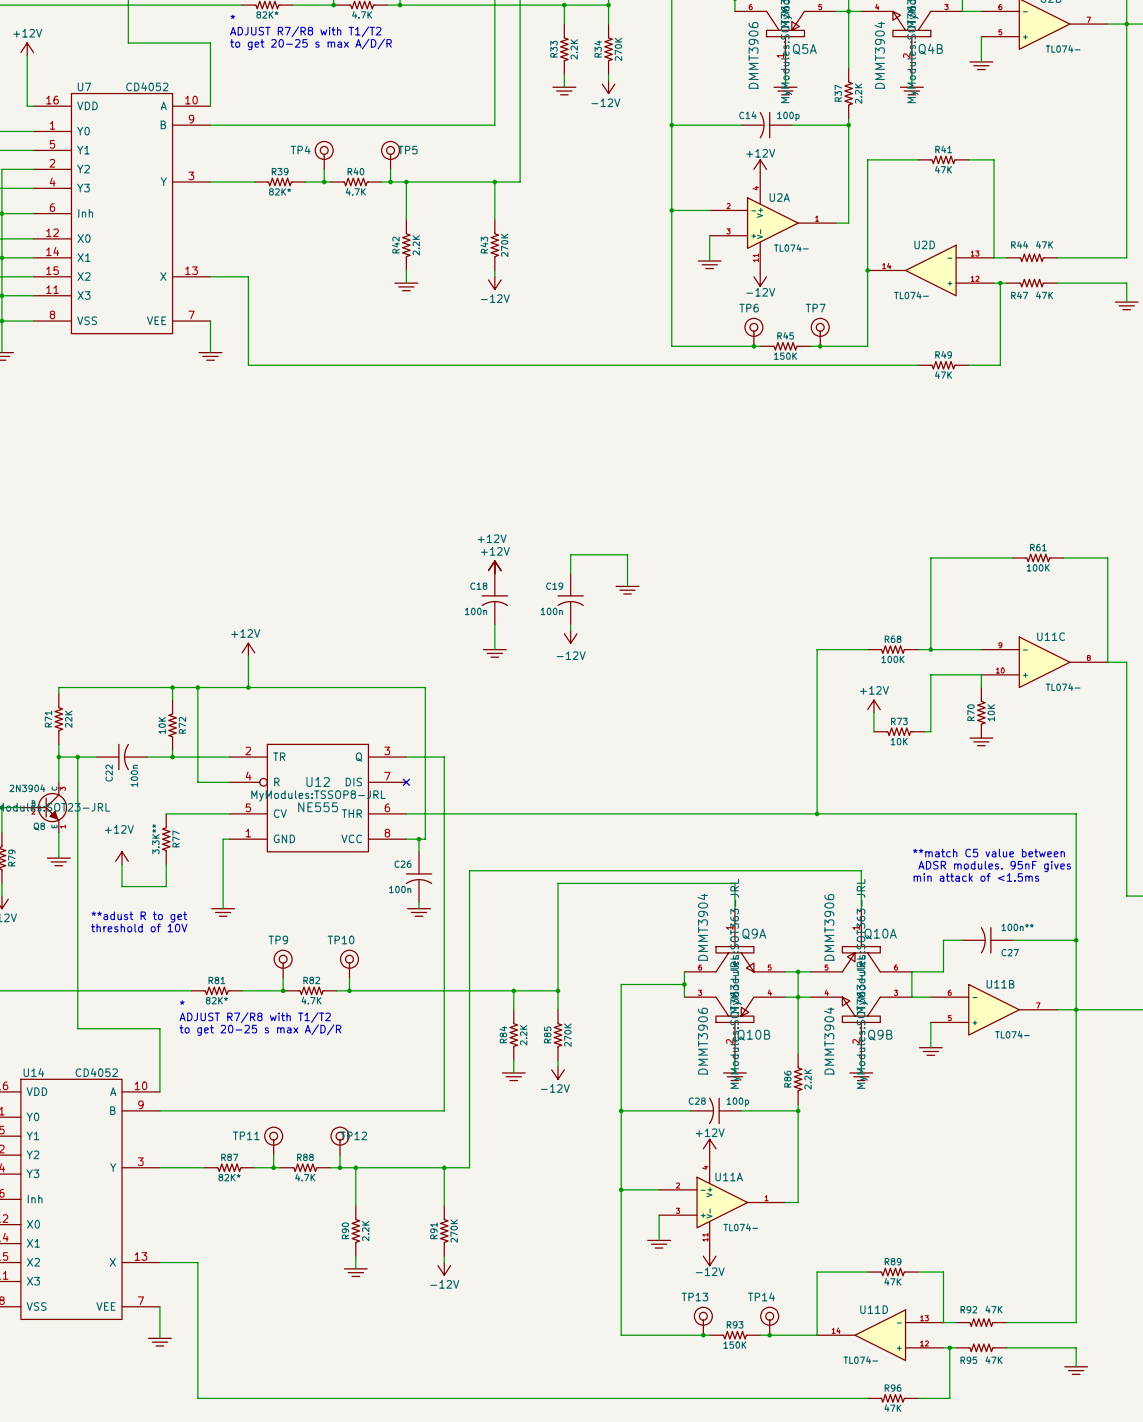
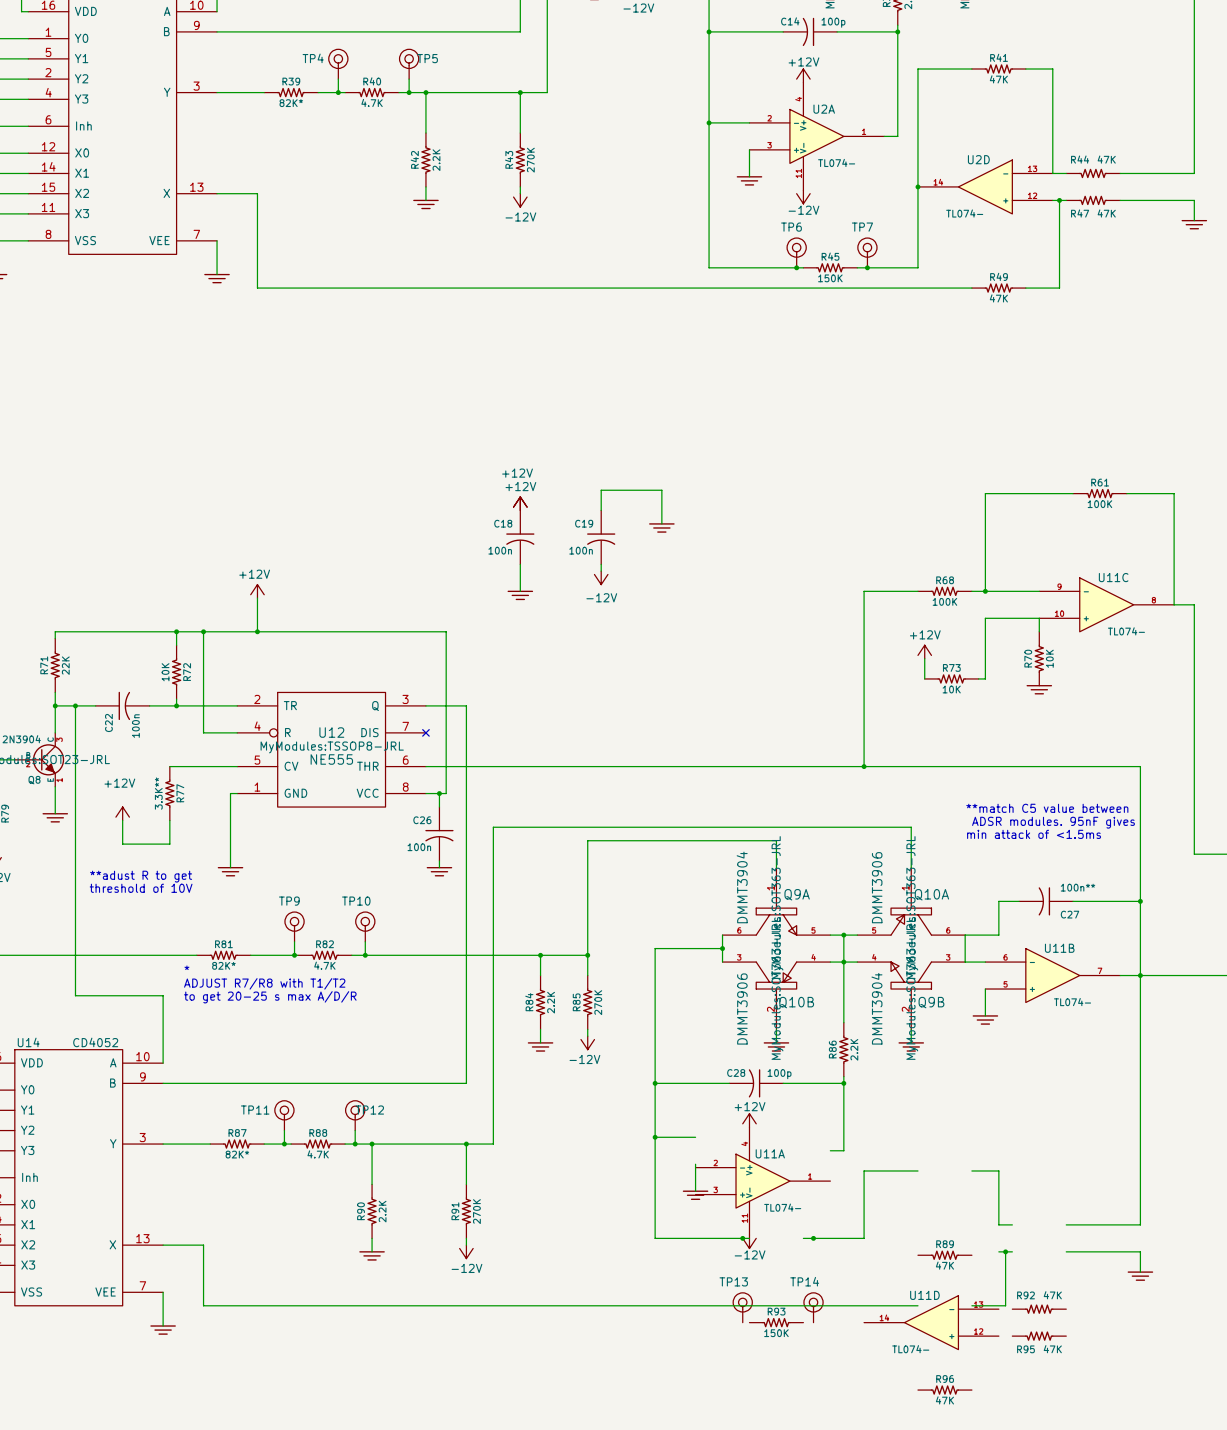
wire: (798, 1174) (798, 1202) (785, 1202) -> (843, 1150) (830, 1150)
wire: (621, 1189) (659, 1189) -> (655, 1137) (695, 1137)
junction position: (621, 1189) -> (655, 1137)
wire: (659, 1215) (659, 1240) -> (695, 1164) (695, 1191)
wire: (1076, 1243) (1076, 1268) -> (1140, 1224) (1066, 1224)
power symbol position: (659, 1244) -> (695, 1195)
wire: (621, 1256) (621, 1335) (709, 1335) -> (655, 1238) (749, 1238)
junction: none -> (742, 1238)
junction: none -> (813, 1238)
junction: none -> (1005, 1251)
wire: none -> (1066, 1251) (1140, 1251)
wire: (867, 1272) (817, 1272) (817, 1335) (760, 1335) -> (917, 1170) (864, 1170) (864, 1238) (803, 1238)
wire: (918, 1272) (943, 1272) (943, 1322) (956, 1322) -> (971, 1170) (998, 1170) (998, 1224) (1012, 1224)
wire: (1076, 1287) (1076, 1322) (1006, 1322) -> none
wire: (197, 1319) (197, 1398) (867, 1398) -> (203, 1305) (917, 1305)
junction: (703, 1335) -> none
junction: (769, 1335) -> none
wire: (943, 1347) (956, 1347) -> (998, 1251) (1012, 1251)
wire: (949, 1347) (949, 1398) (918, 1398) -> (1005, 1251) (1005, 1305) (971, 1305)
junction: (949, 1347) -> none
wire: (1006, 1347) (1076, 1347) (1076, 1366) -> none
power symbol position: (1076, 1370) -> (1140, 1276)

